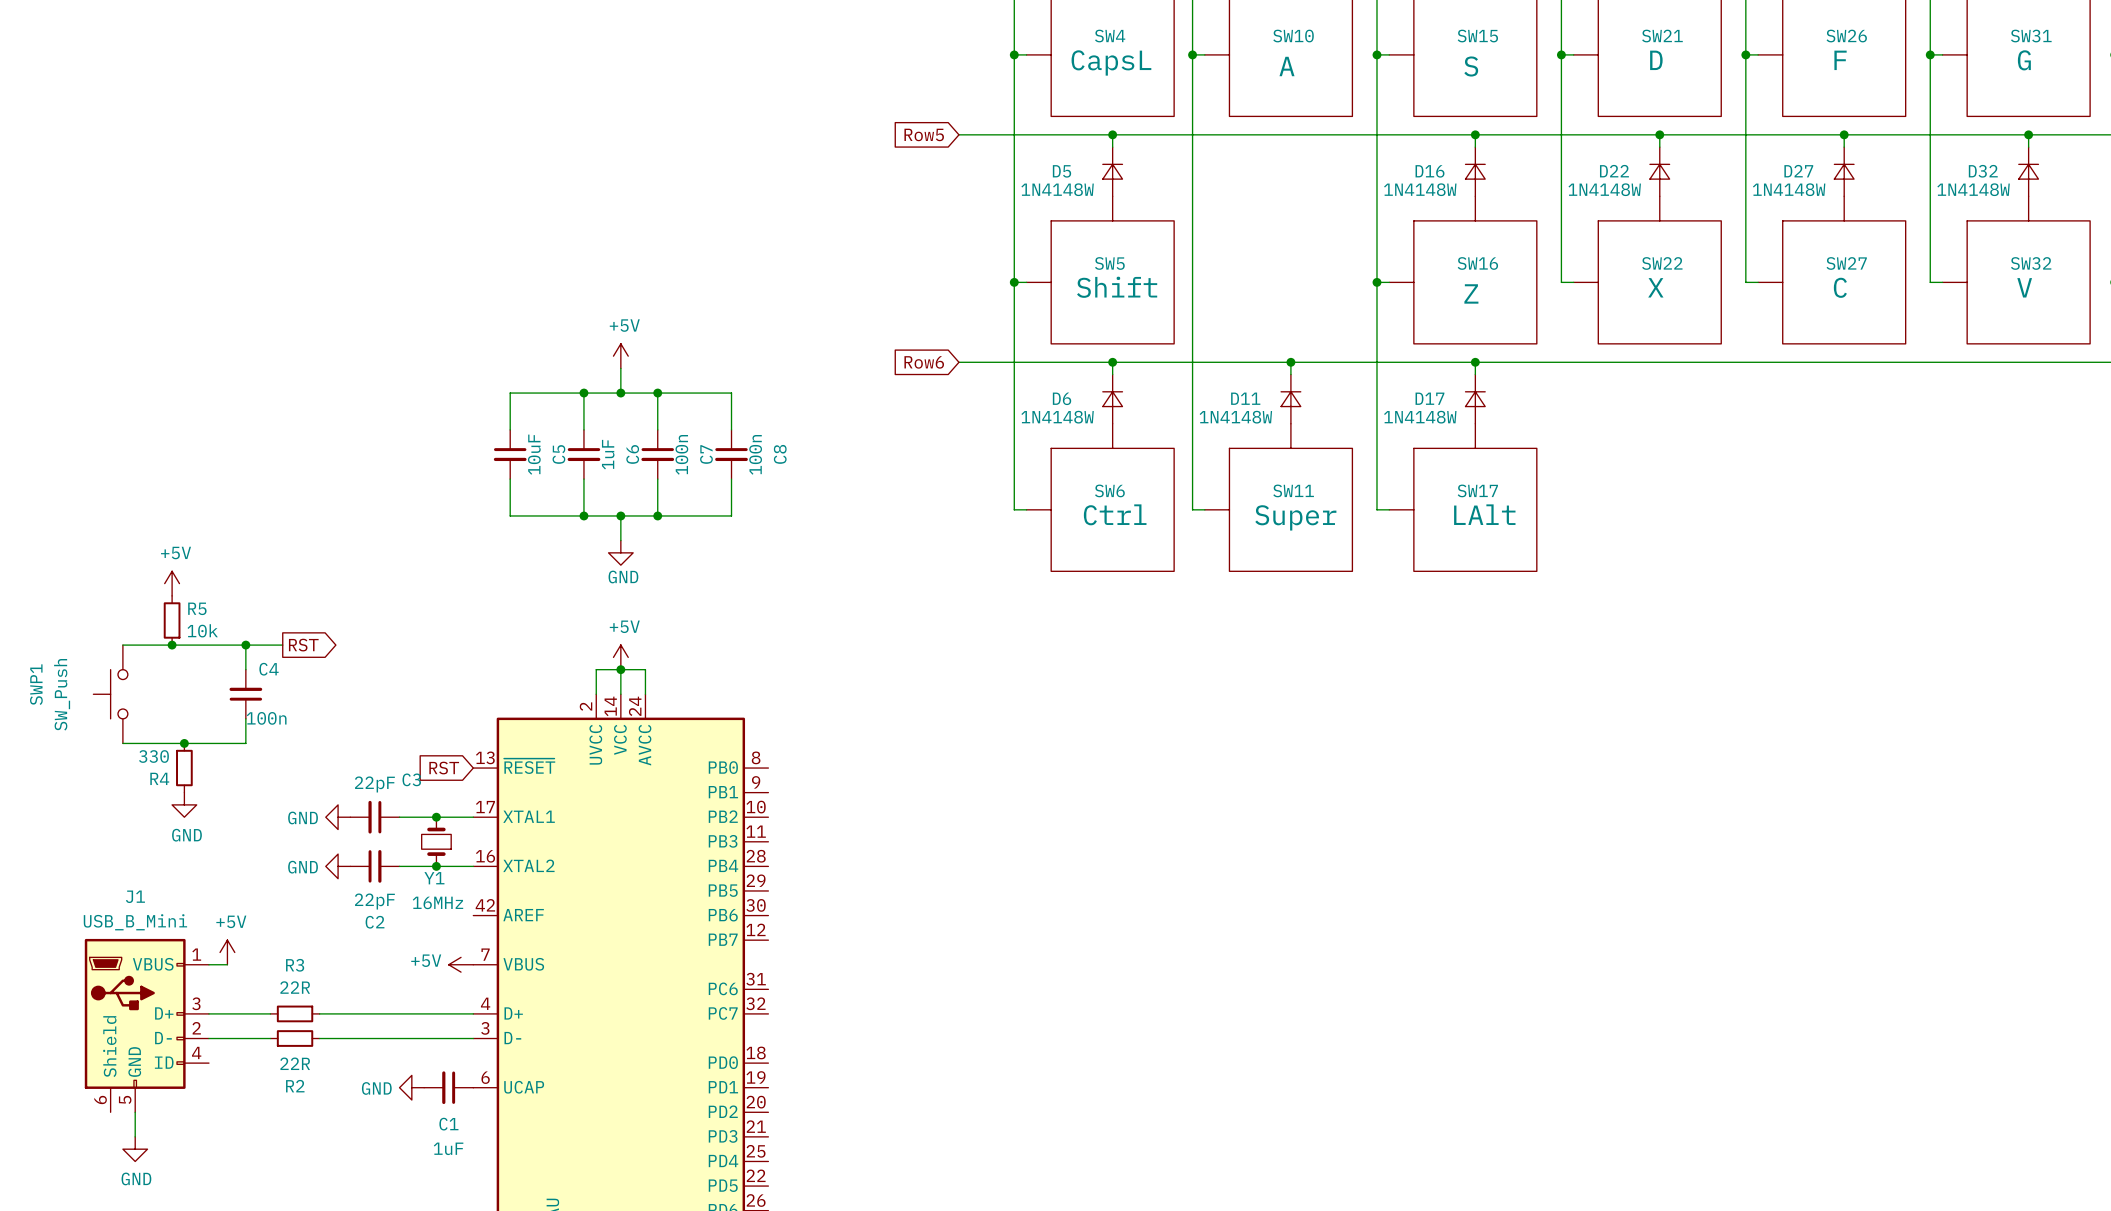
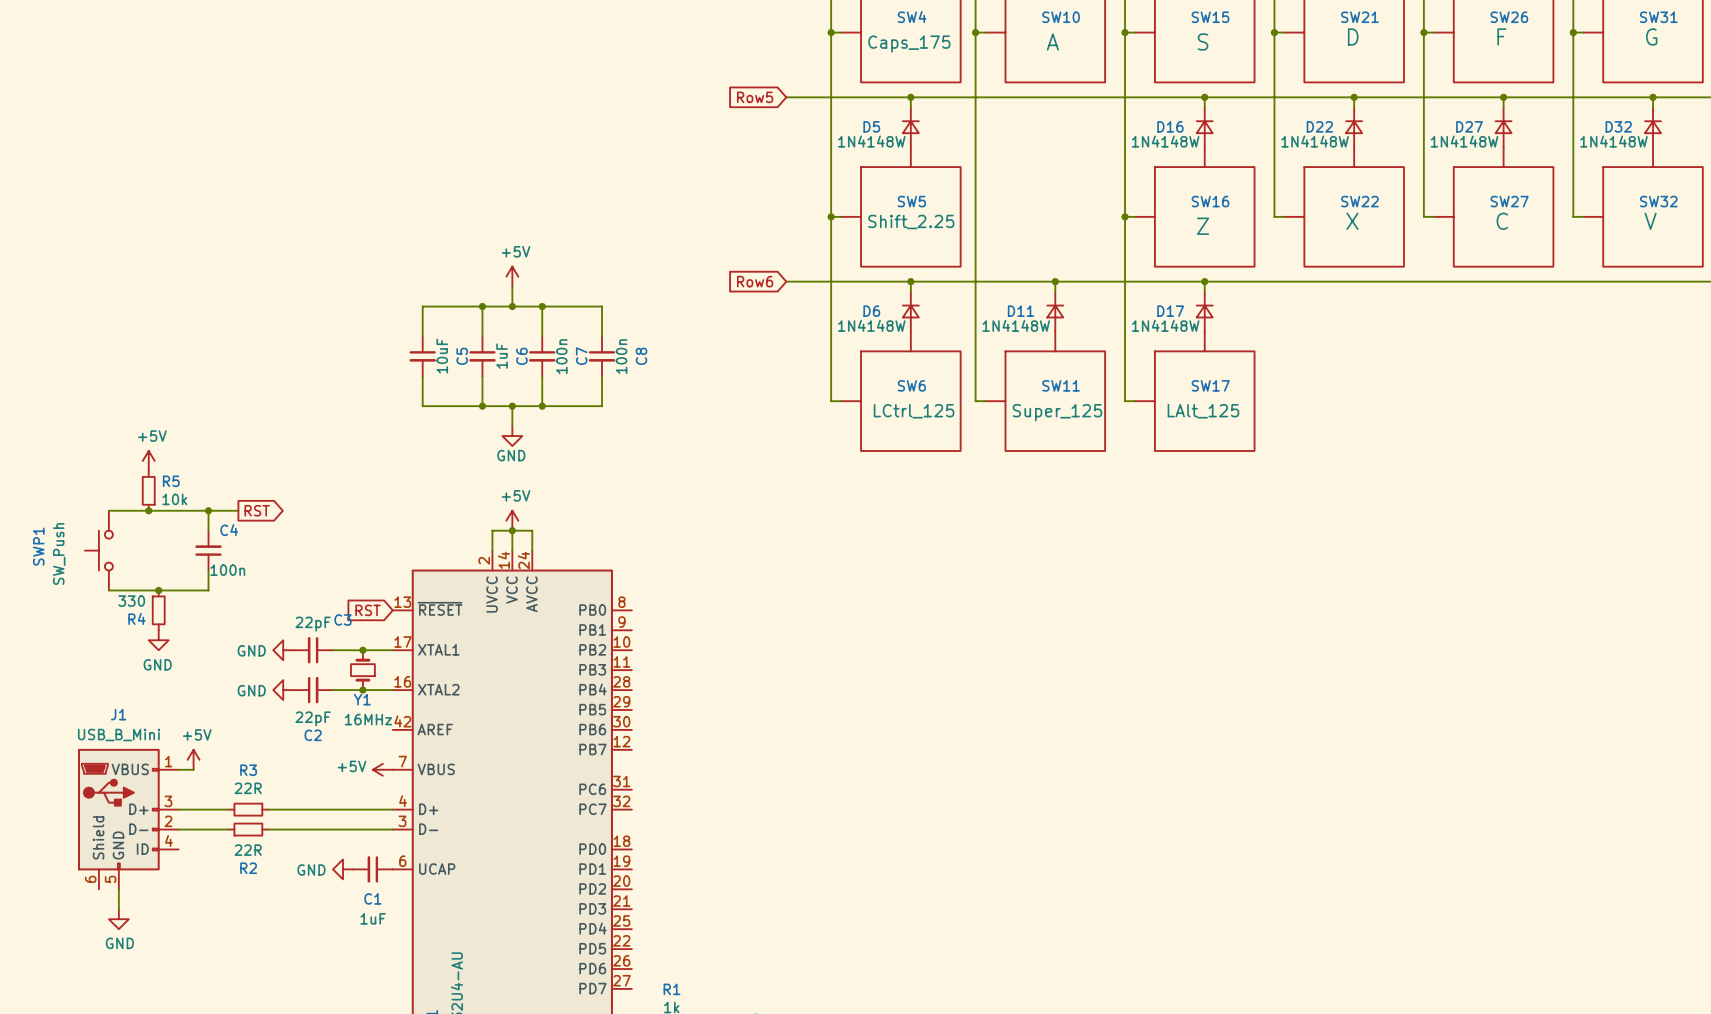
SW4 value: CapsL (1111, 62) -> Caps_175 (909, 44)
SW5 value: Shift (1117, 287) -> Shift_2.25 (911, 221)
SW6 value: Ctrl (1115, 514) -> LCtrl_125 (914, 411)
SW17 value: LAlt (1484, 514) -> LAlt_125 (1203, 411)
SW11 value: Super (1295, 517) -> Super_125 (1057, 412)

